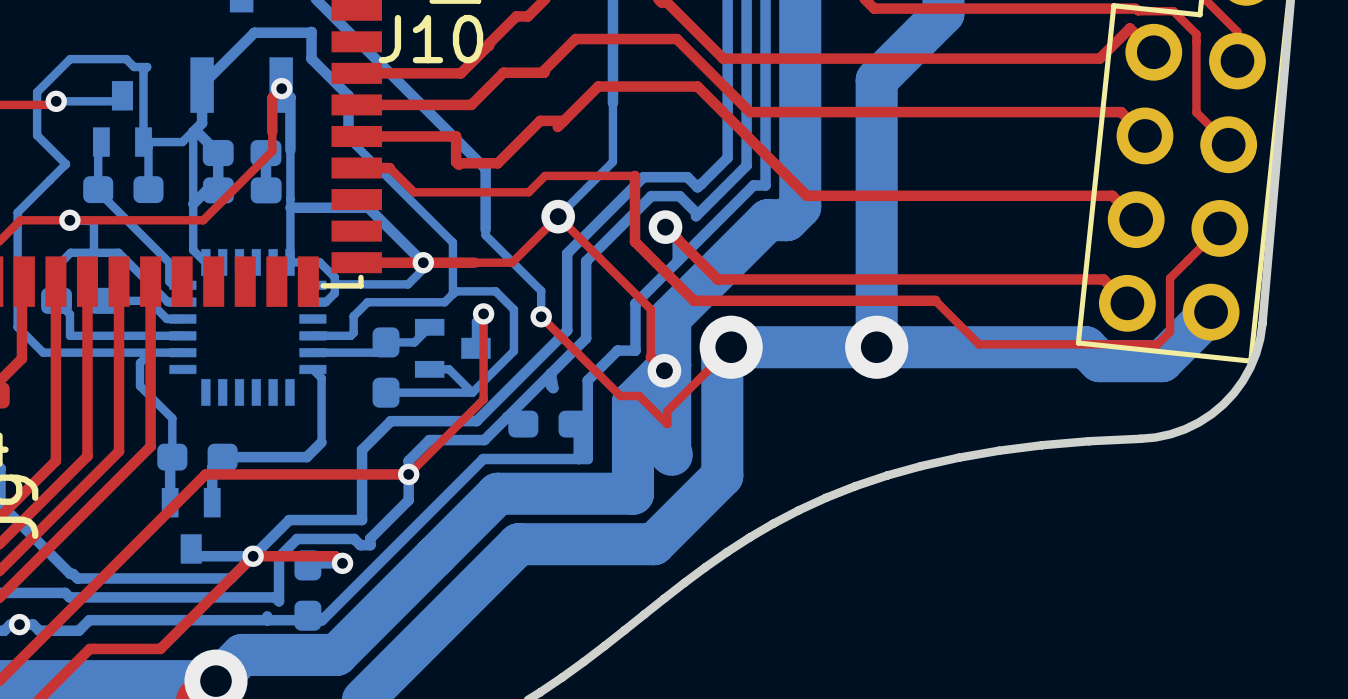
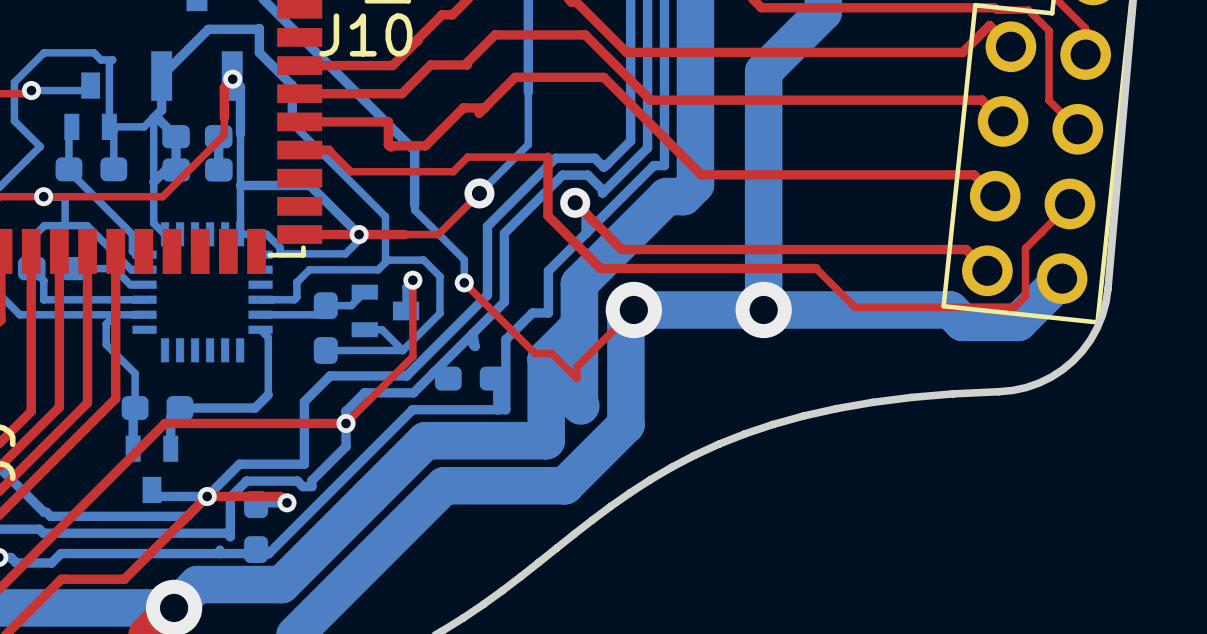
top track: (558, 216) (650, 309) (650, 357) (664, 370) -> none
bottom track: (334, 284) (334, 293) (325, 302) (312, 302) -> none
via: (664, 370) -> none

